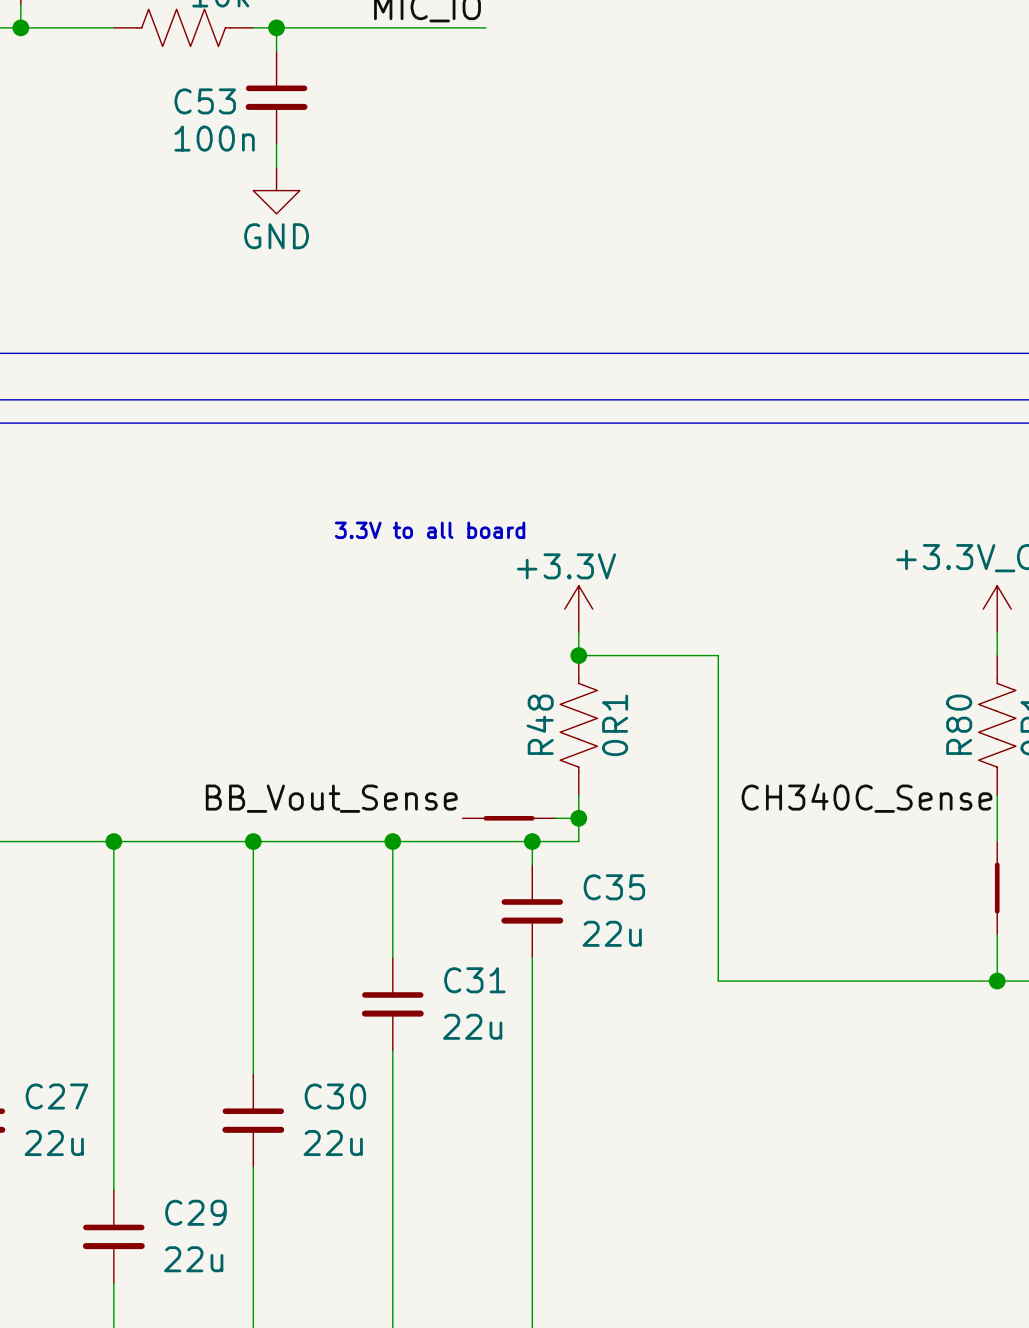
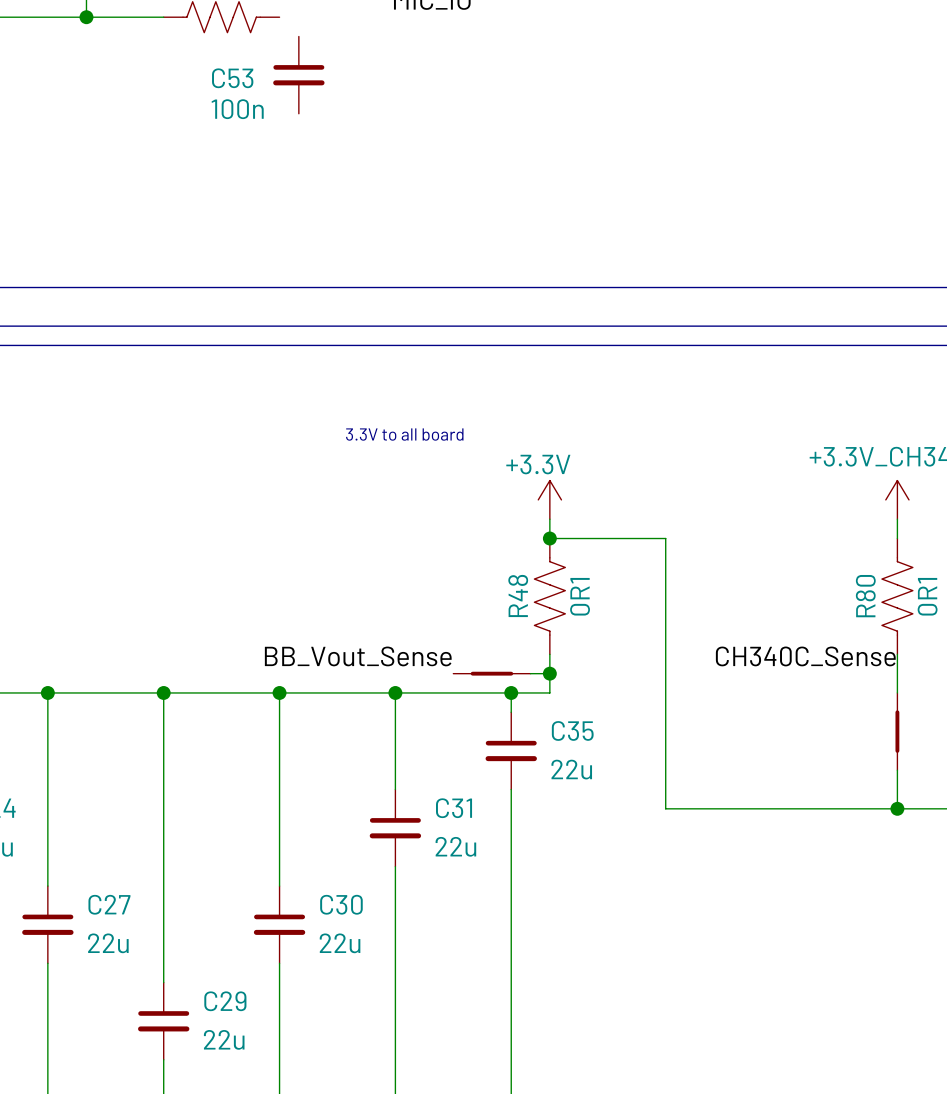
wire: (253, 27) (485, 27) -> none
wire: (276, 27) (276, 51) -> none
junction: (276, 27) -> none
wire: (276, 144) (276, 167) -> none
power symbol: GND (276, 190) -> none

